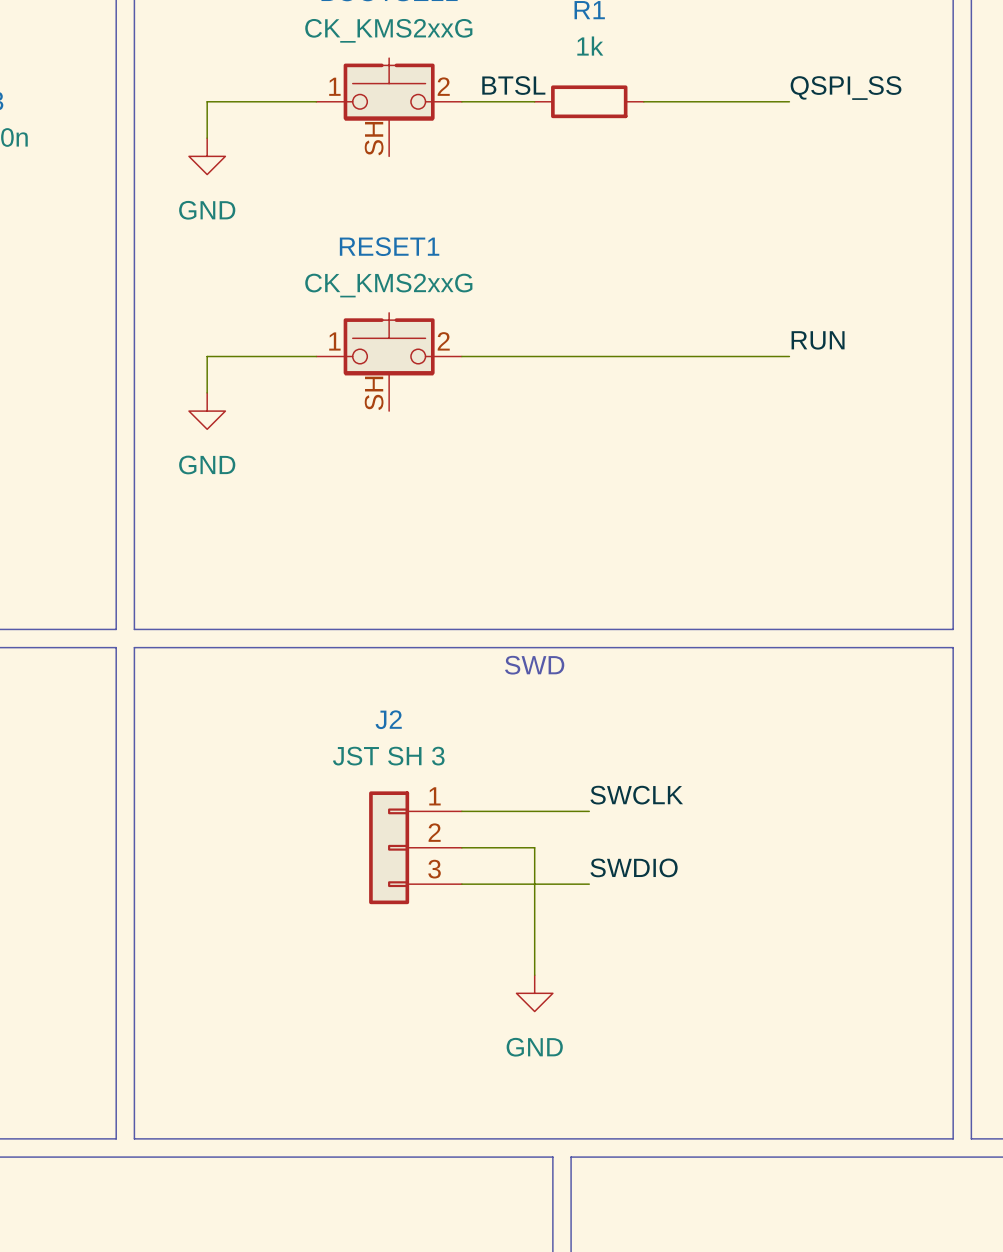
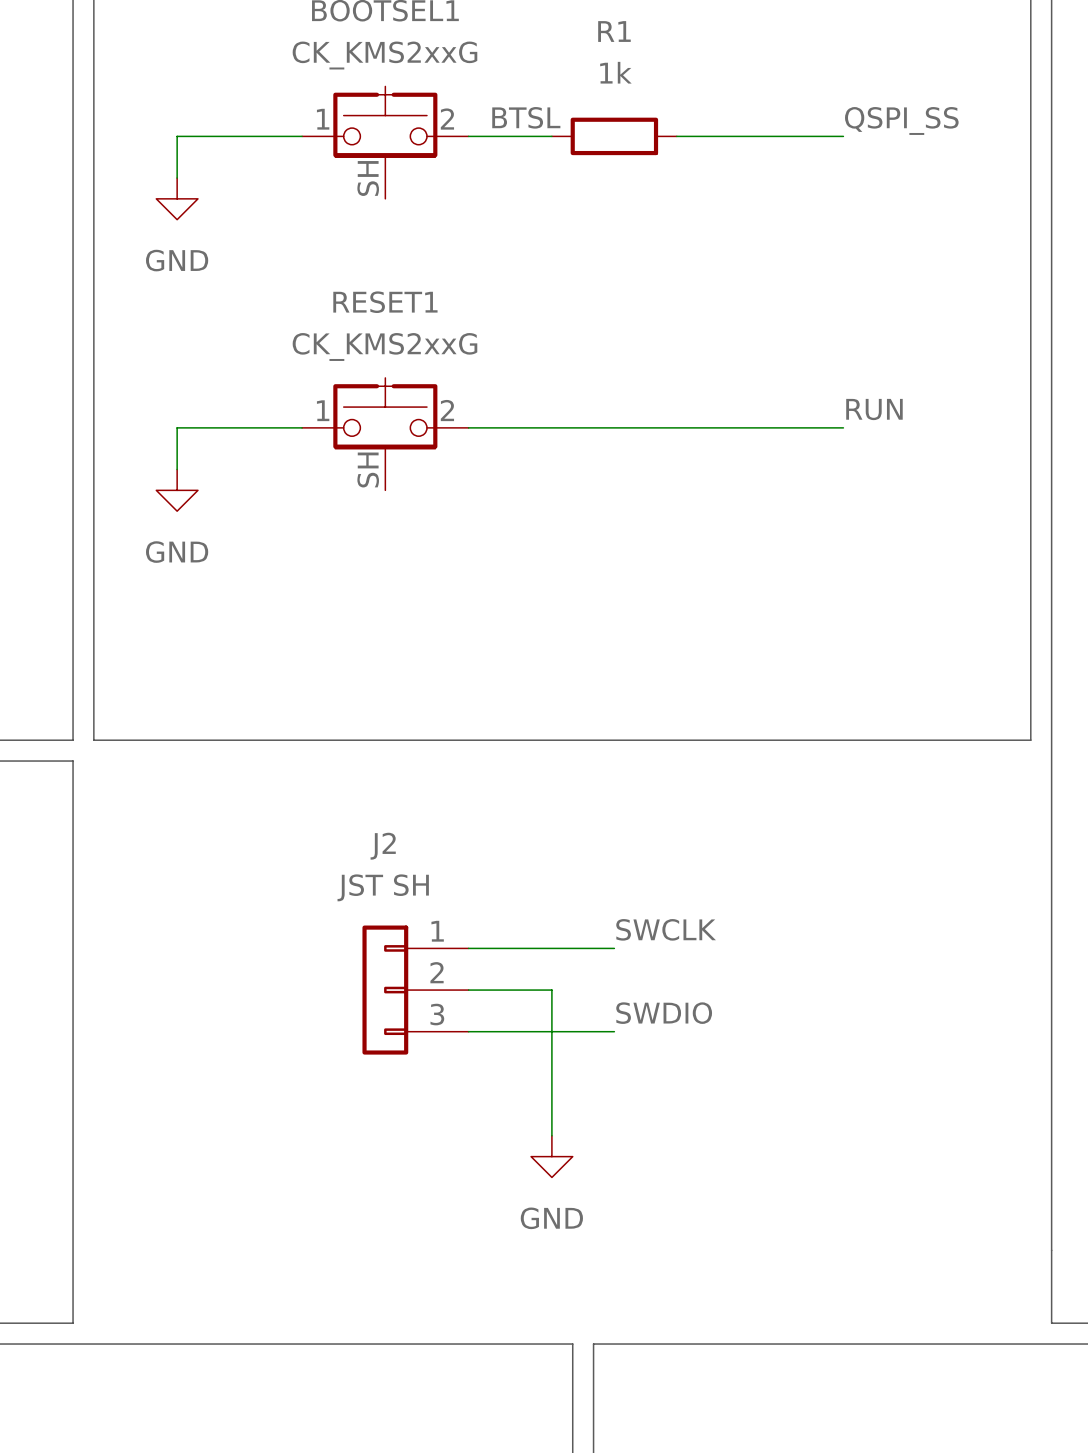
line: (134, 647) (953, 647) (953, 1138) (134, 1138) (134, 647) -> none
text: SWD (534, 665) -> none
J2 value: JST SH 3 (388, 756) -> JST SH (383, 887)

